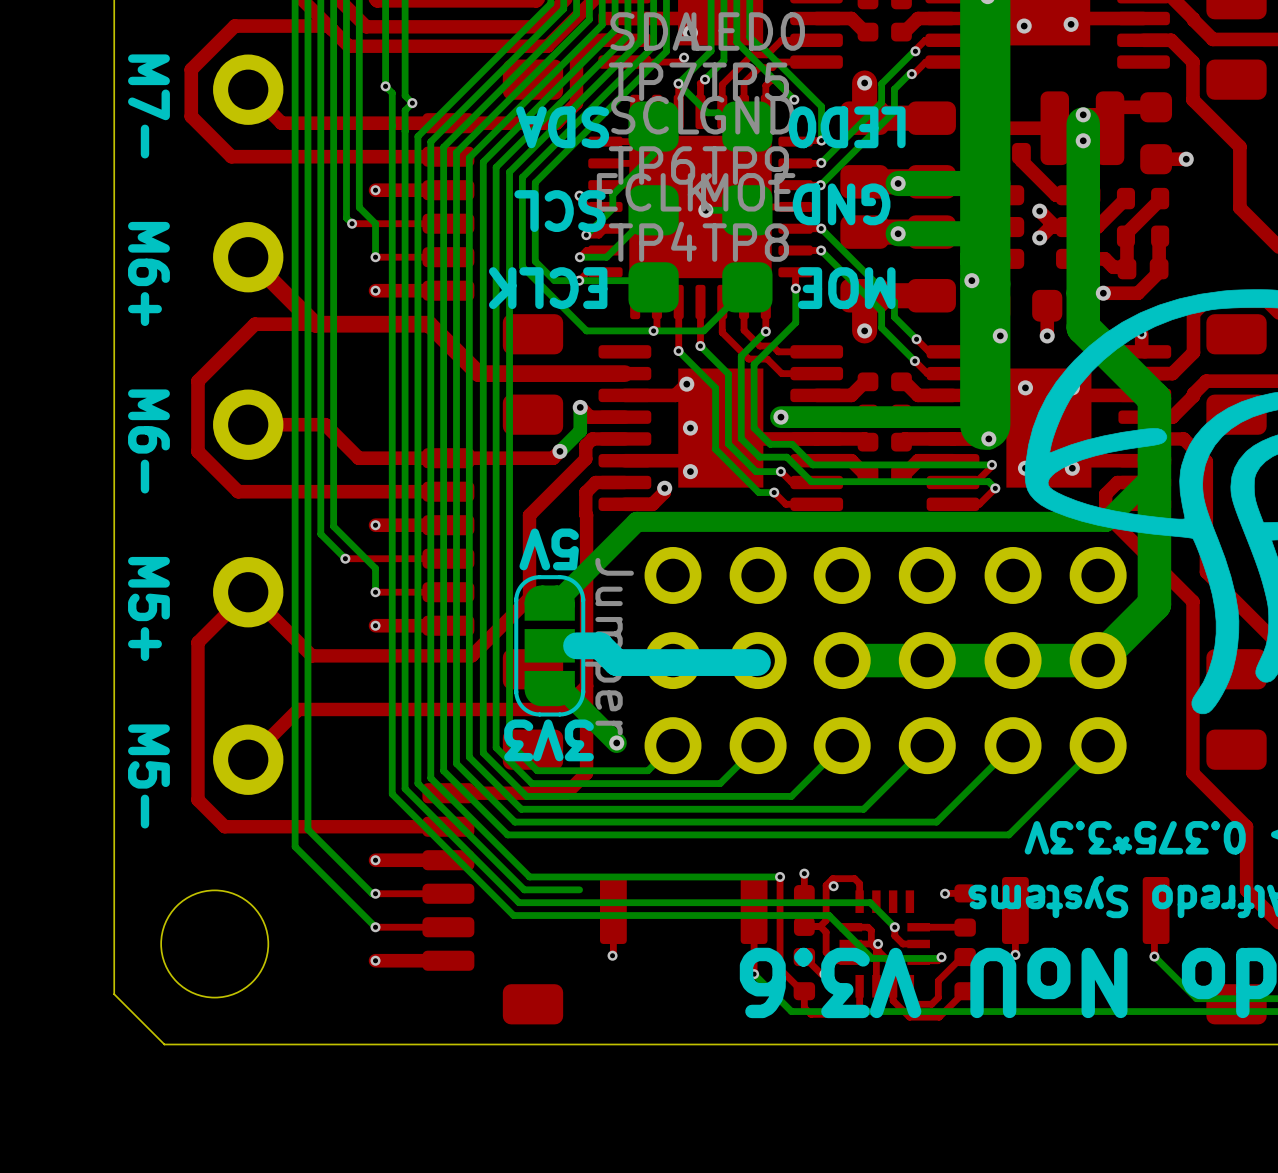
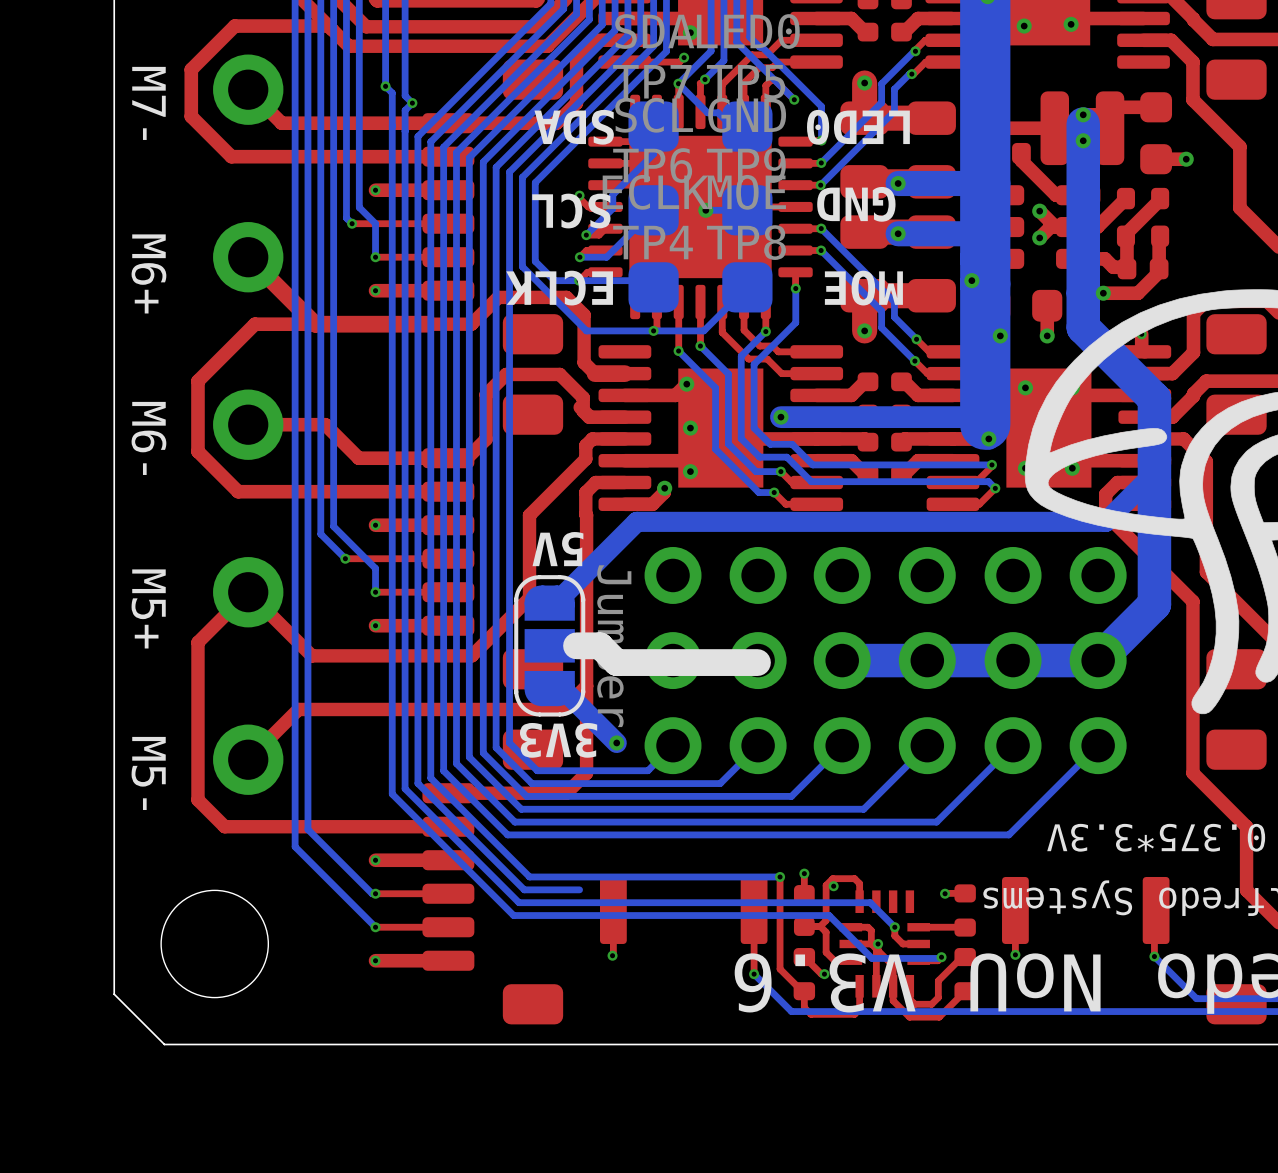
top track: (429, 324) (478, 373) (595, 373) -> (429, 324) (471, 324) (498, 297) (566, 297) (584, 315) (584, 362) (595, 373)
bottom track: (580, 407) (580, 431) (559, 451) -> none
via: (580, 407) -> none
top track: (559, 451) (553, 458) (467, 458) -> (590, 417) (583, 411) (583, 397) (559, 374) (506, 374) (486, 394) (486, 439) (467, 458)
via: (559, 451) -> none

